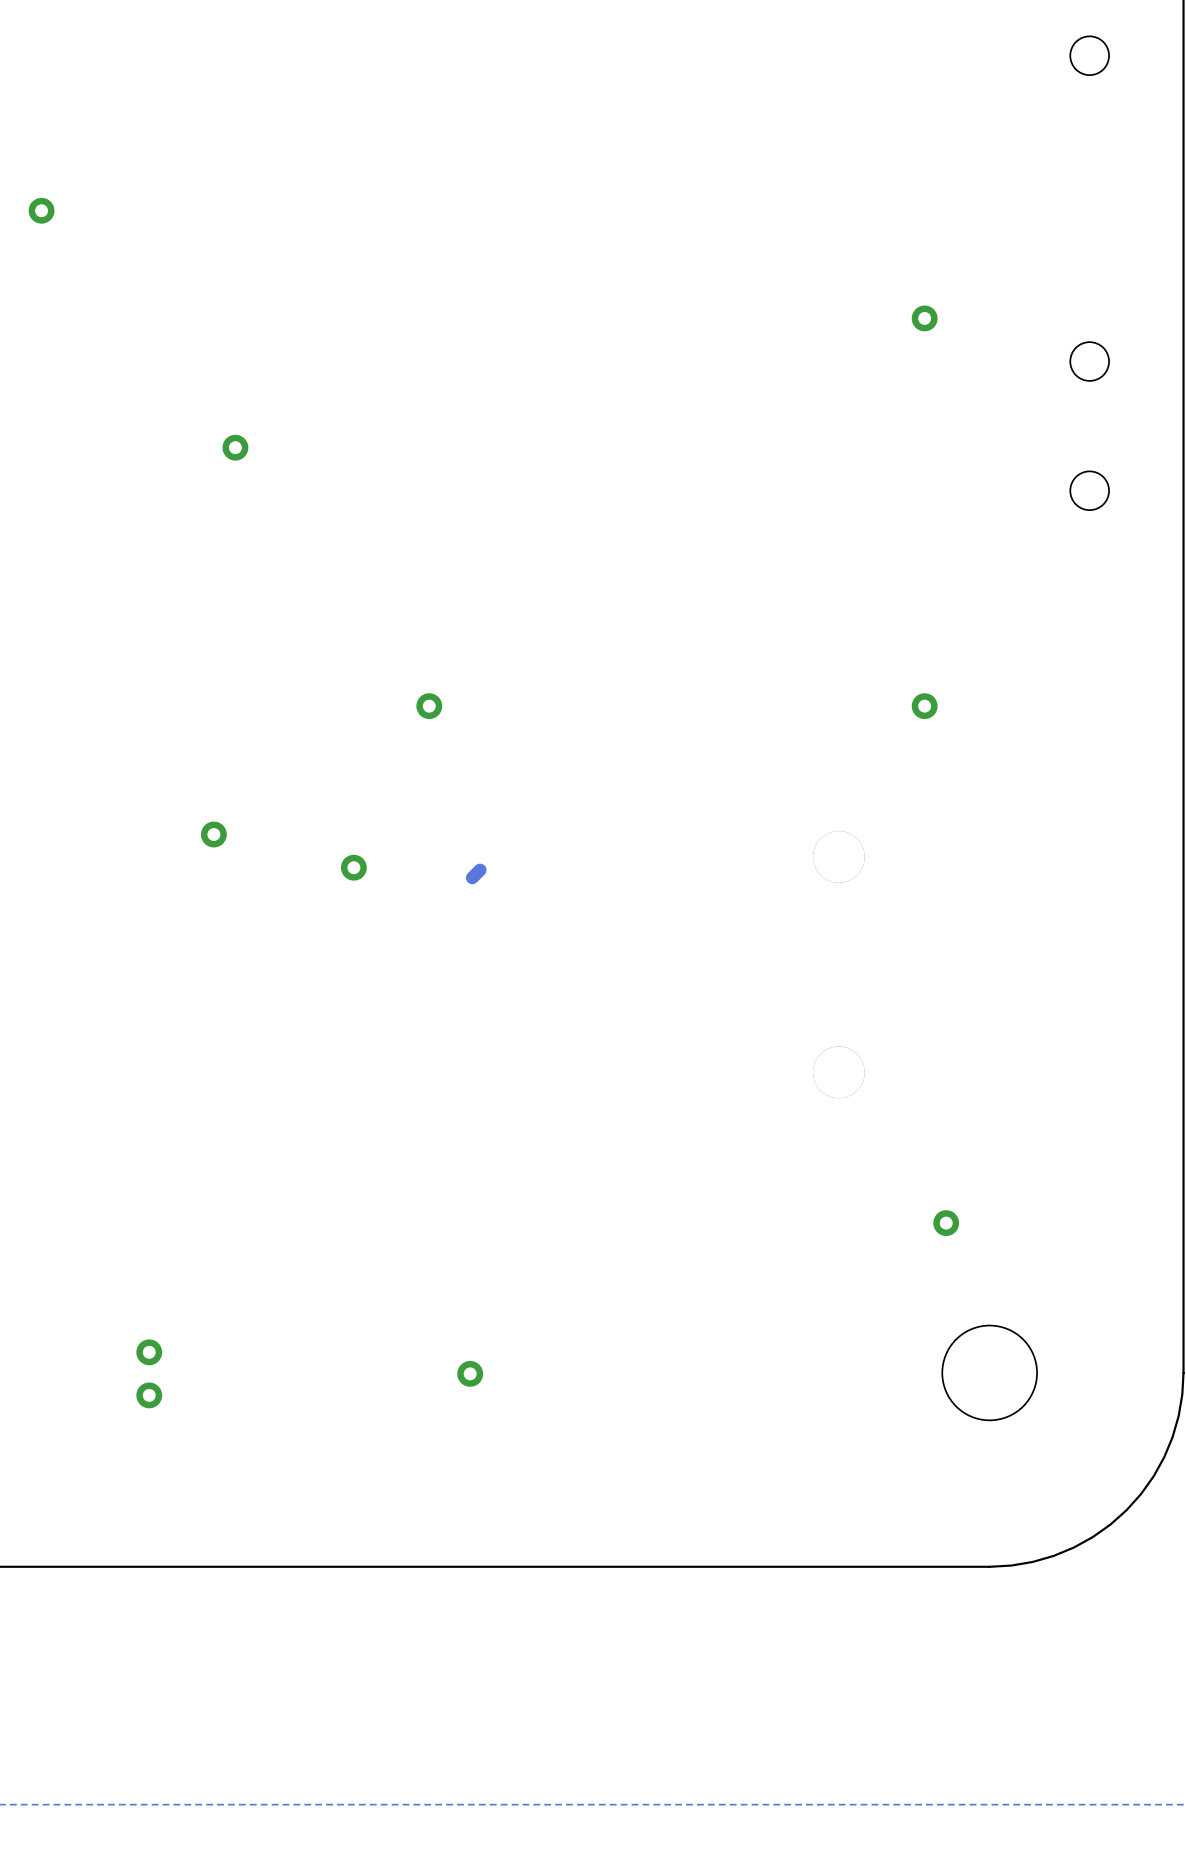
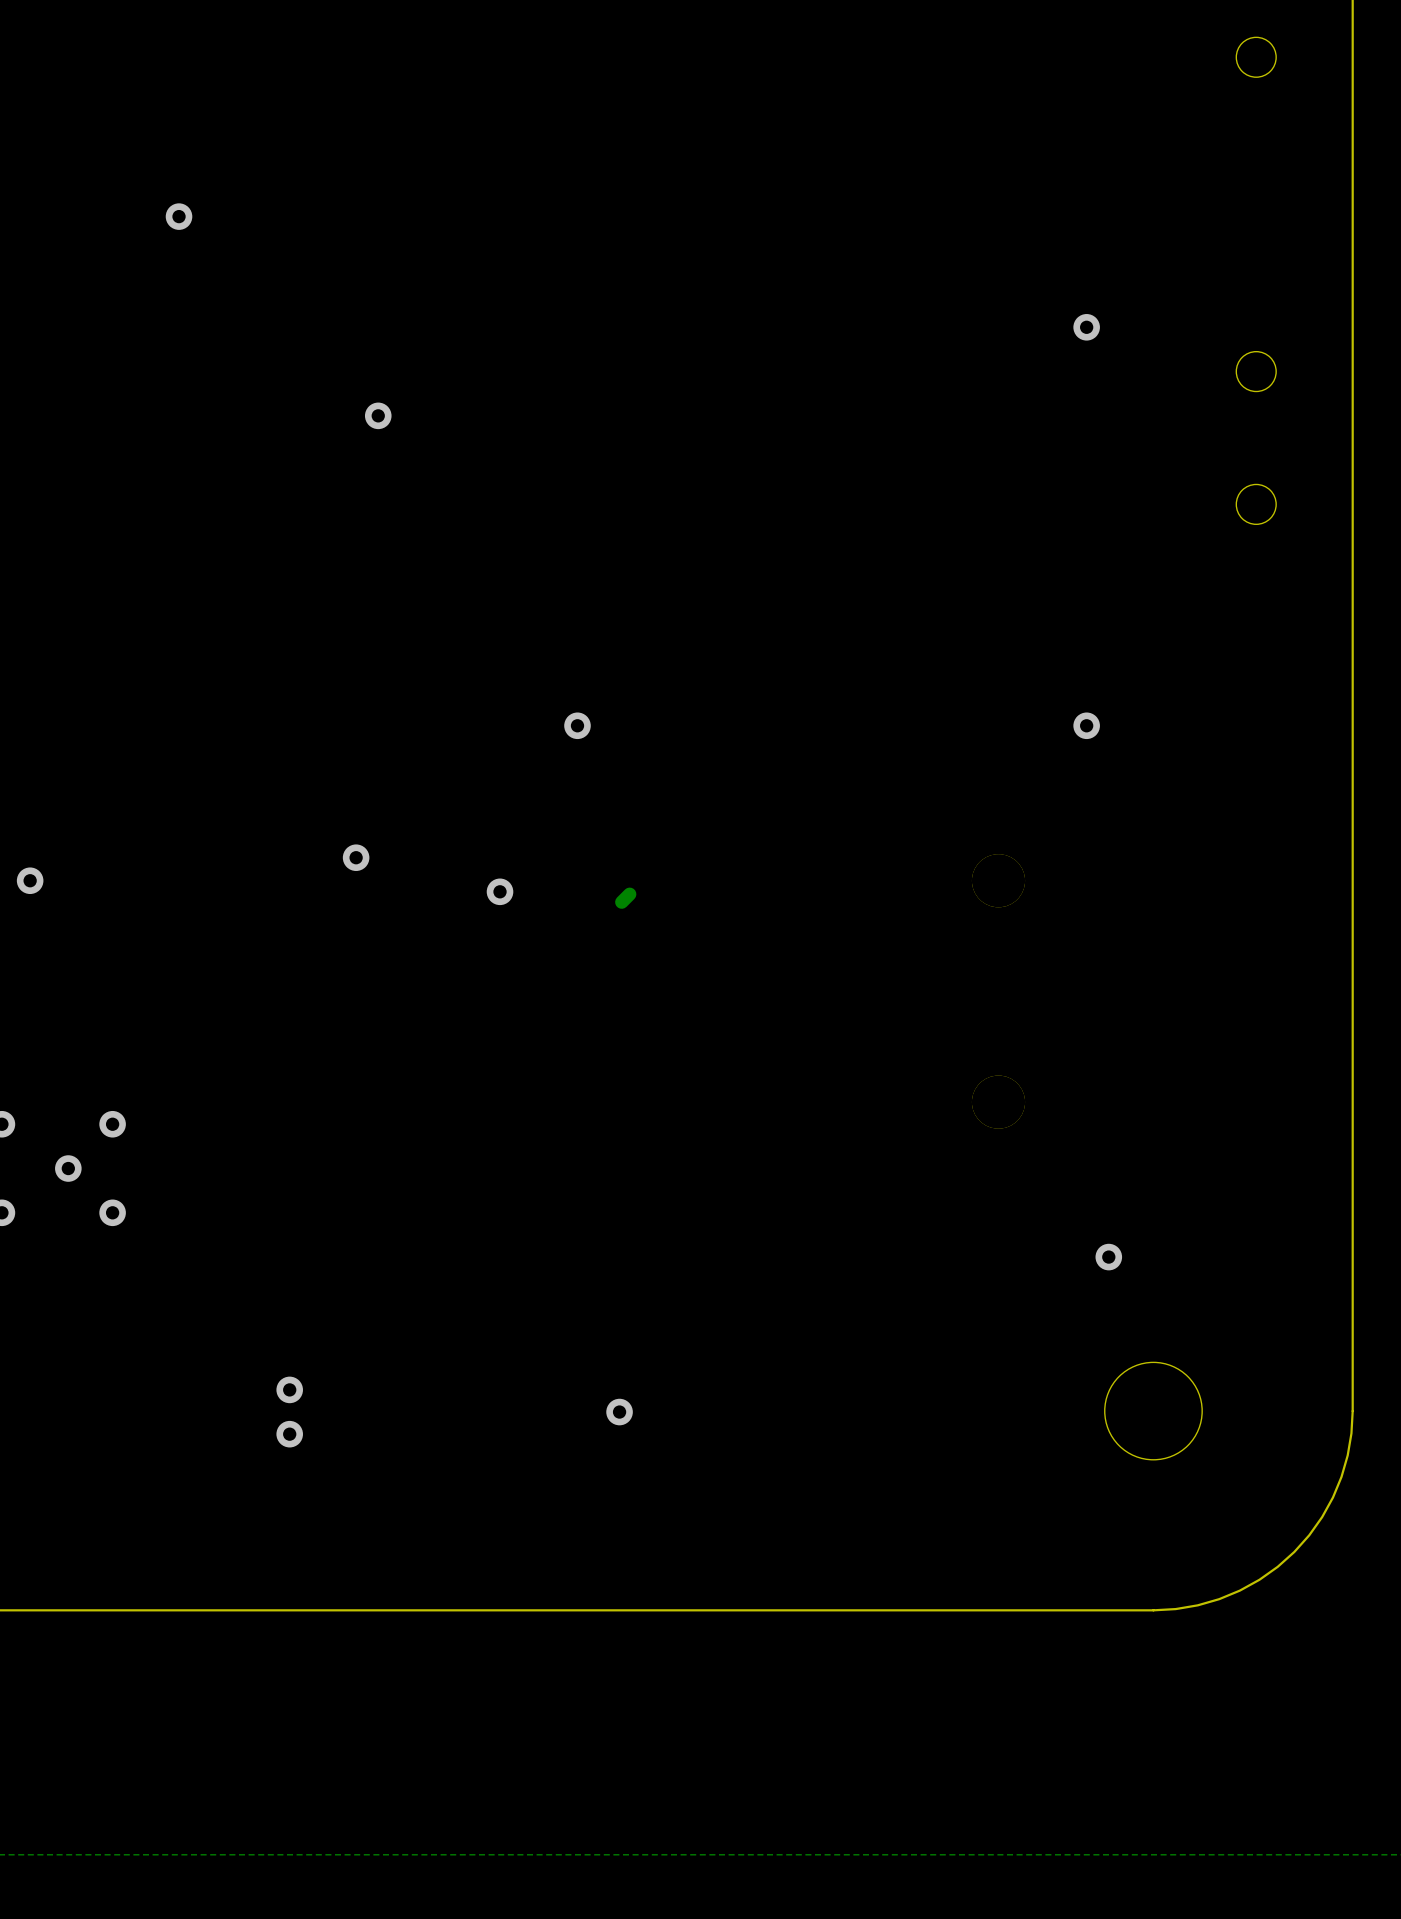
via position: (235, 447) -> (378, 415)

